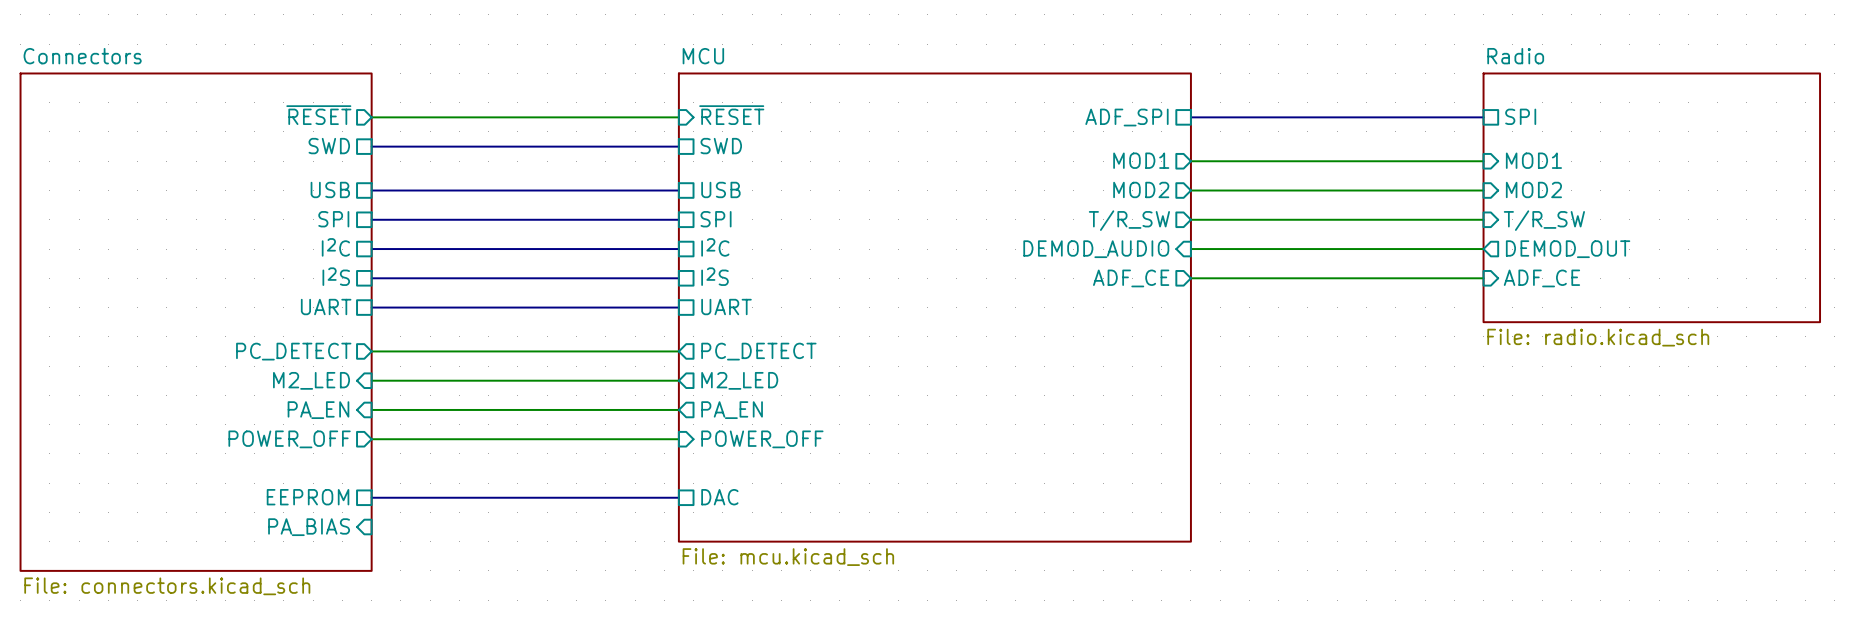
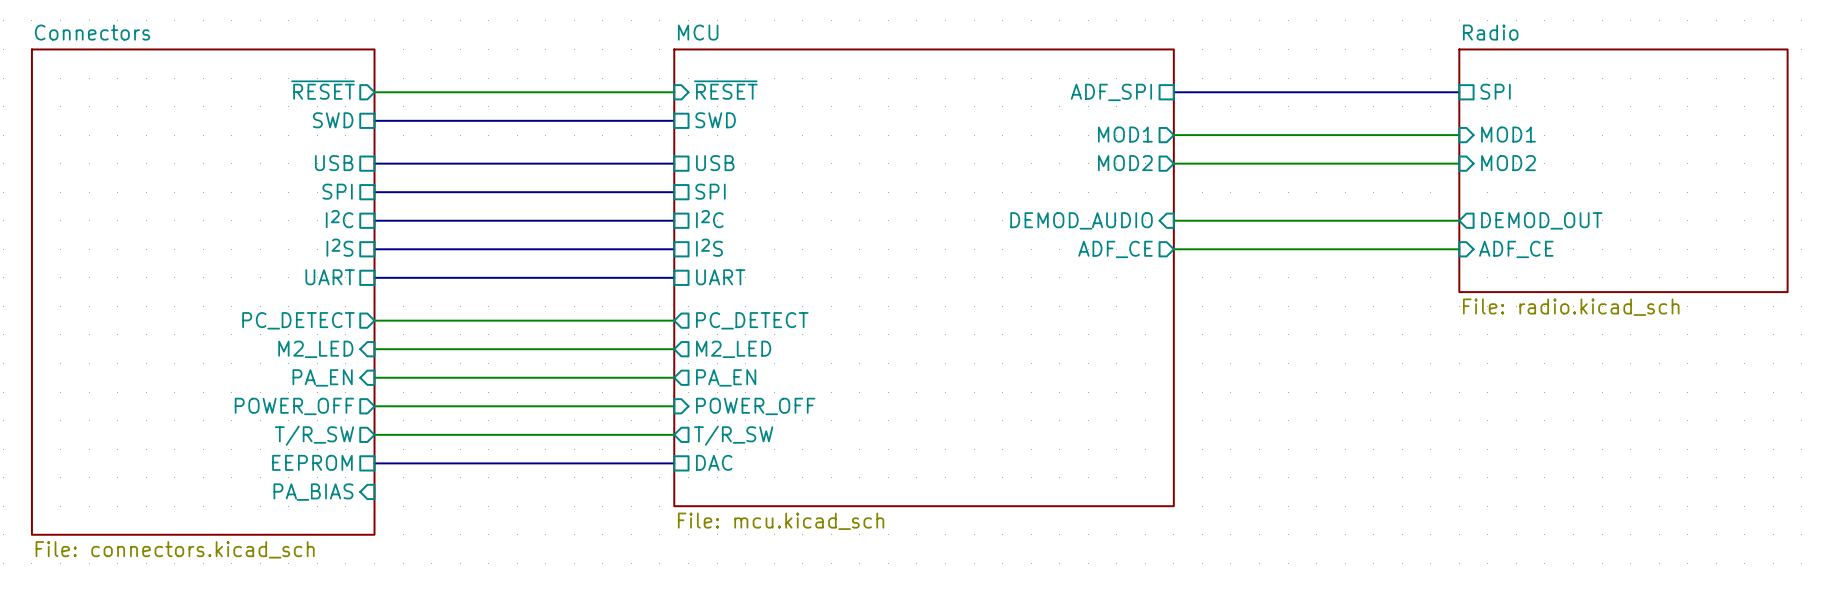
wire: (1190, 219) (1483, 219) -> none
sheet pin: T/R_SW (1129, 220) -> none
sheet pin: T/R_SW (1544, 220) -> none
wire: none -> (374, 434) (674, 434)
sheet pin: none -> T/R_SW (314, 435)
sheet pin: none -> T/R_SW (733, 435)

